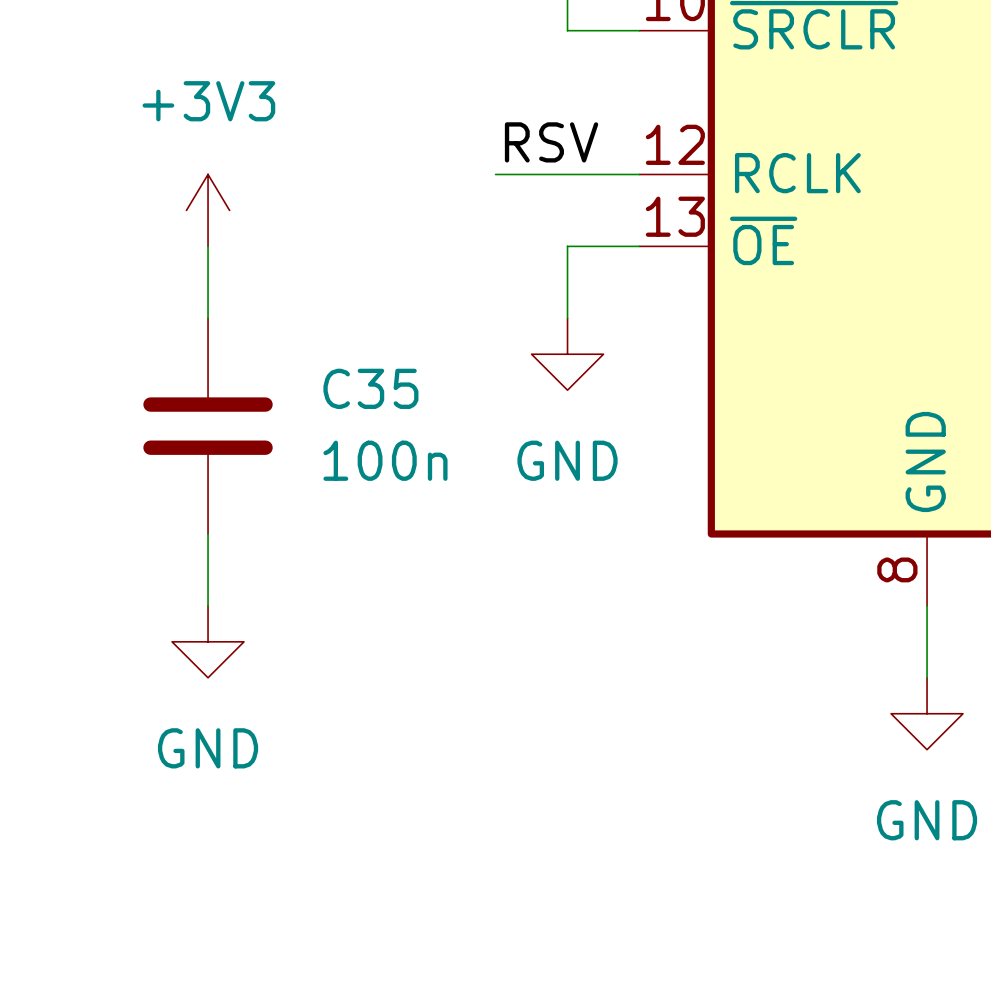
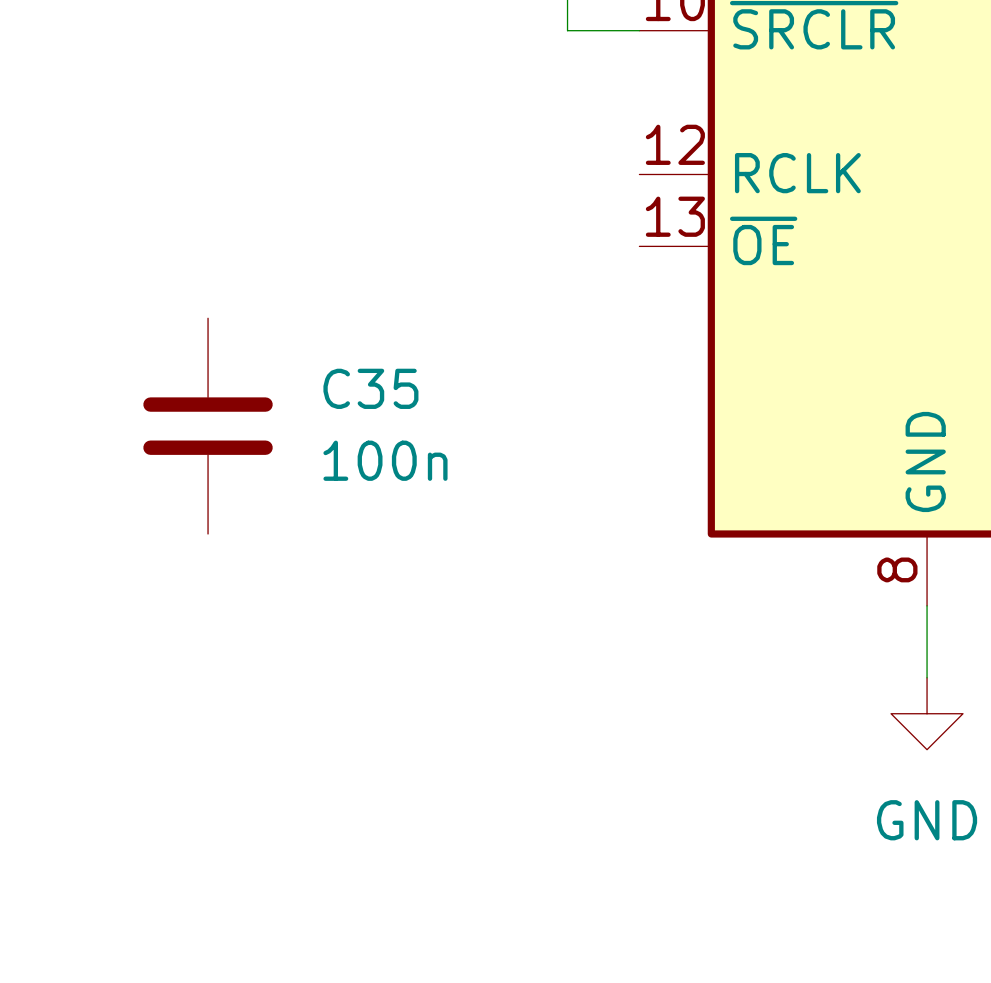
label: RSV (551, 142) -> none
wire: (495, 174) (639, 174) -> none
power symbol: +3V3 (208, 210) -> none
wire: (208, 246) (208, 318) -> none
wire: (639, 246) (567, 246) (567, 318) -> none
power symbol: GND (567, 354) -> none
wire: (208, 533) (208, 605) -> none
power symbol: GND (208, 641) -> none

